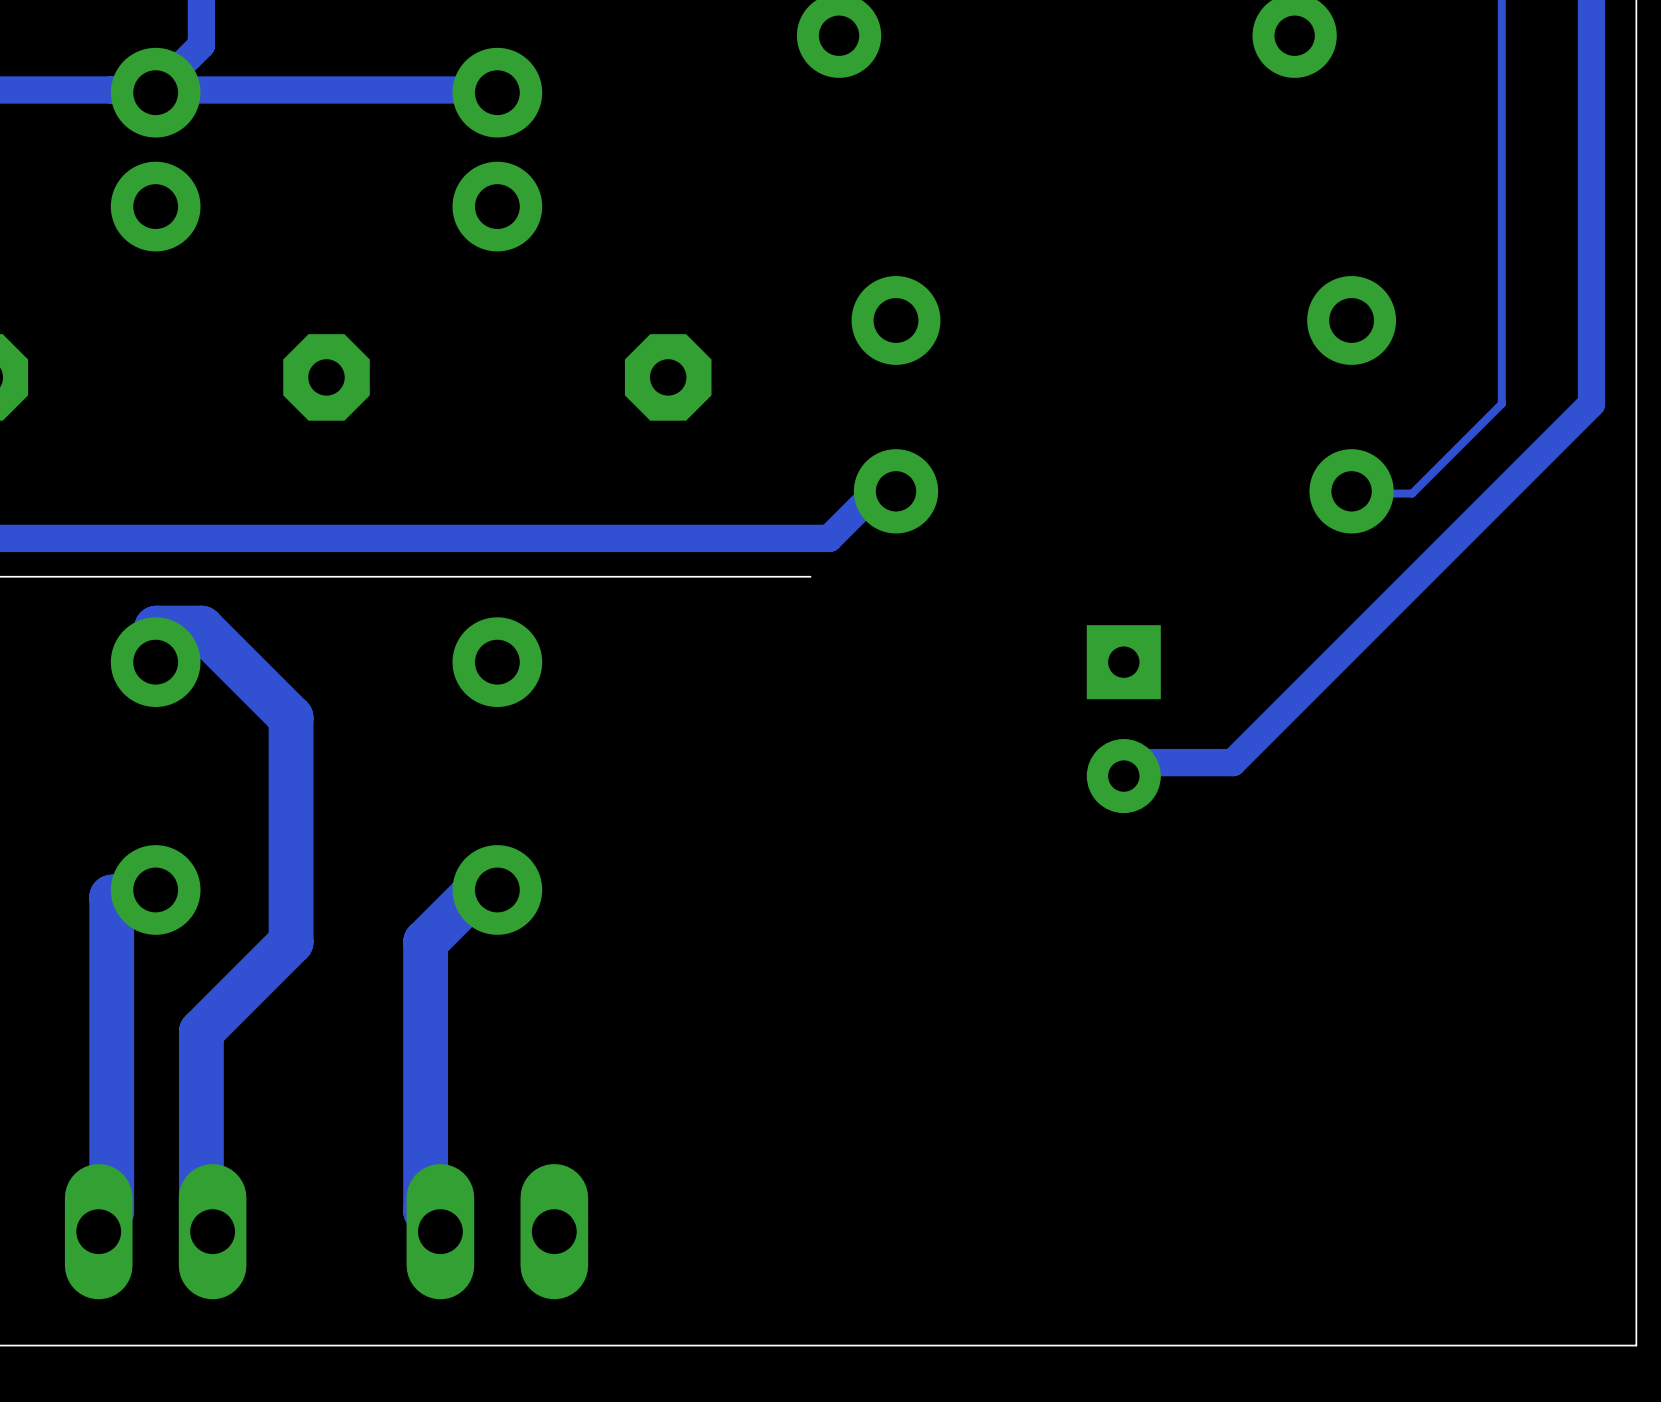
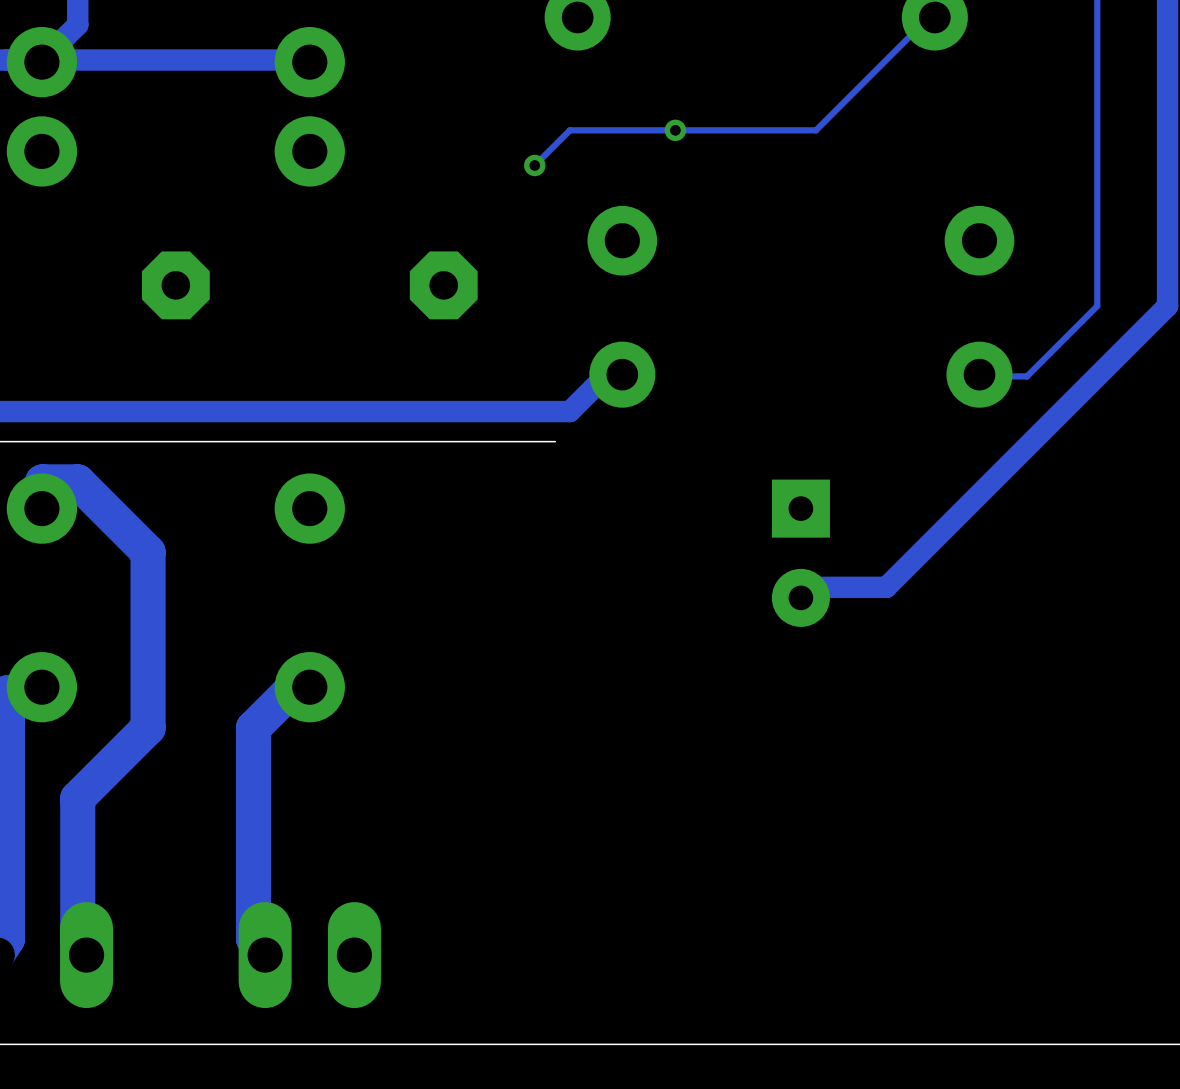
track: none -> (934, 17) (921, 24) (816, 130) (569, 130) (534, 165)
via: none -> (675, 130)
via: none -> (534, 165)

